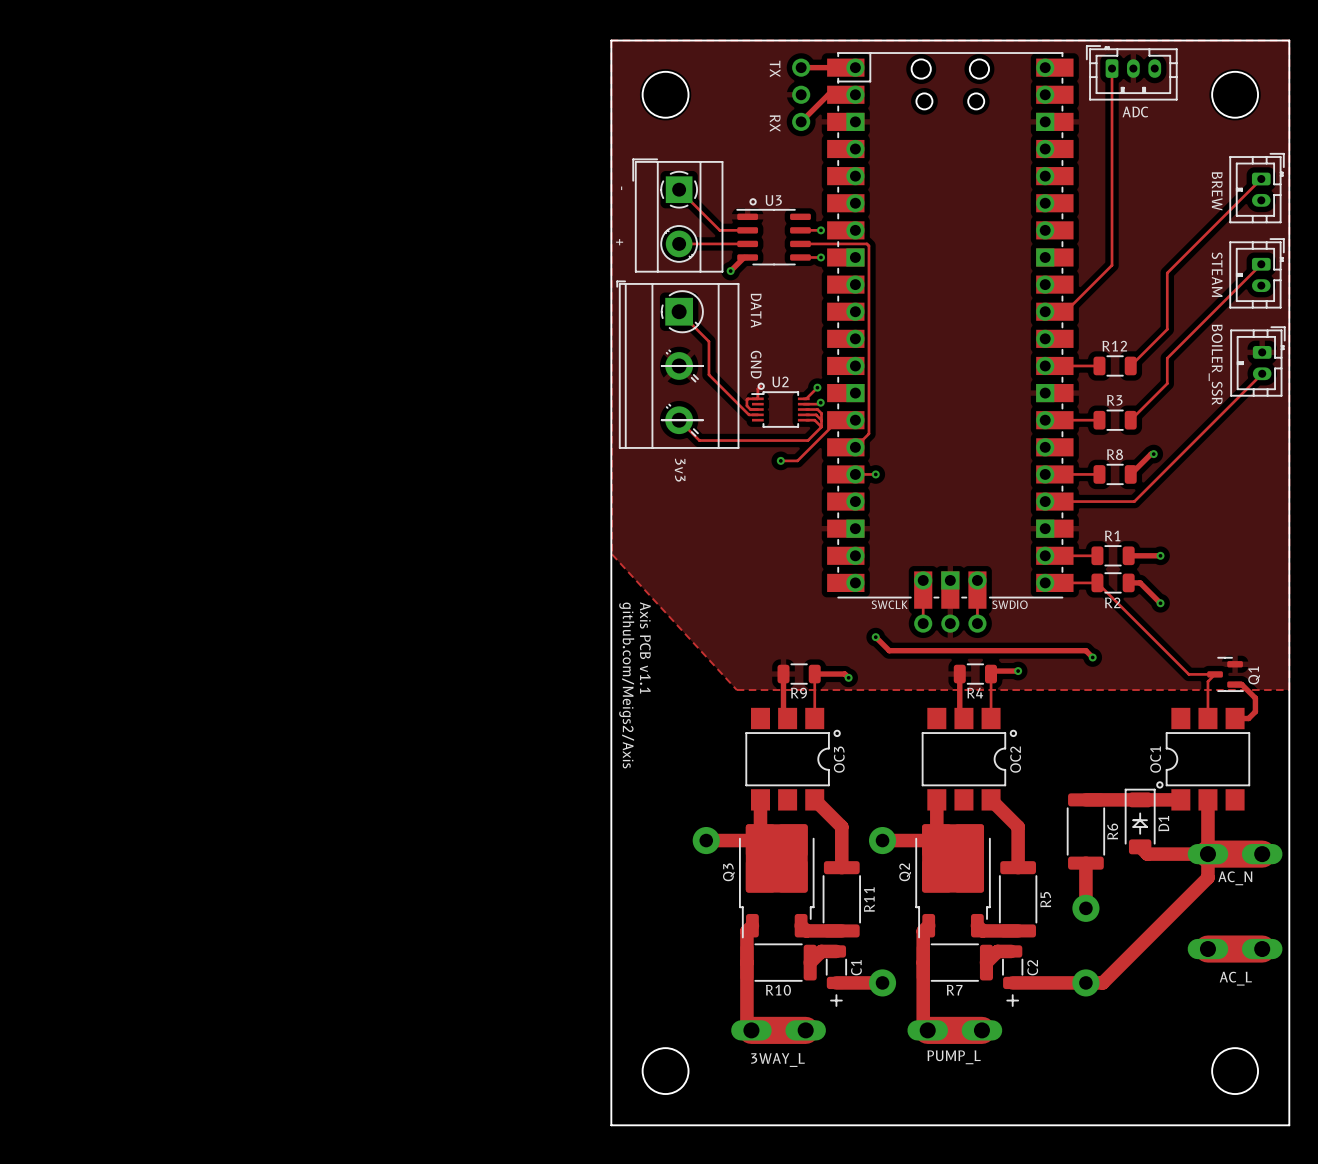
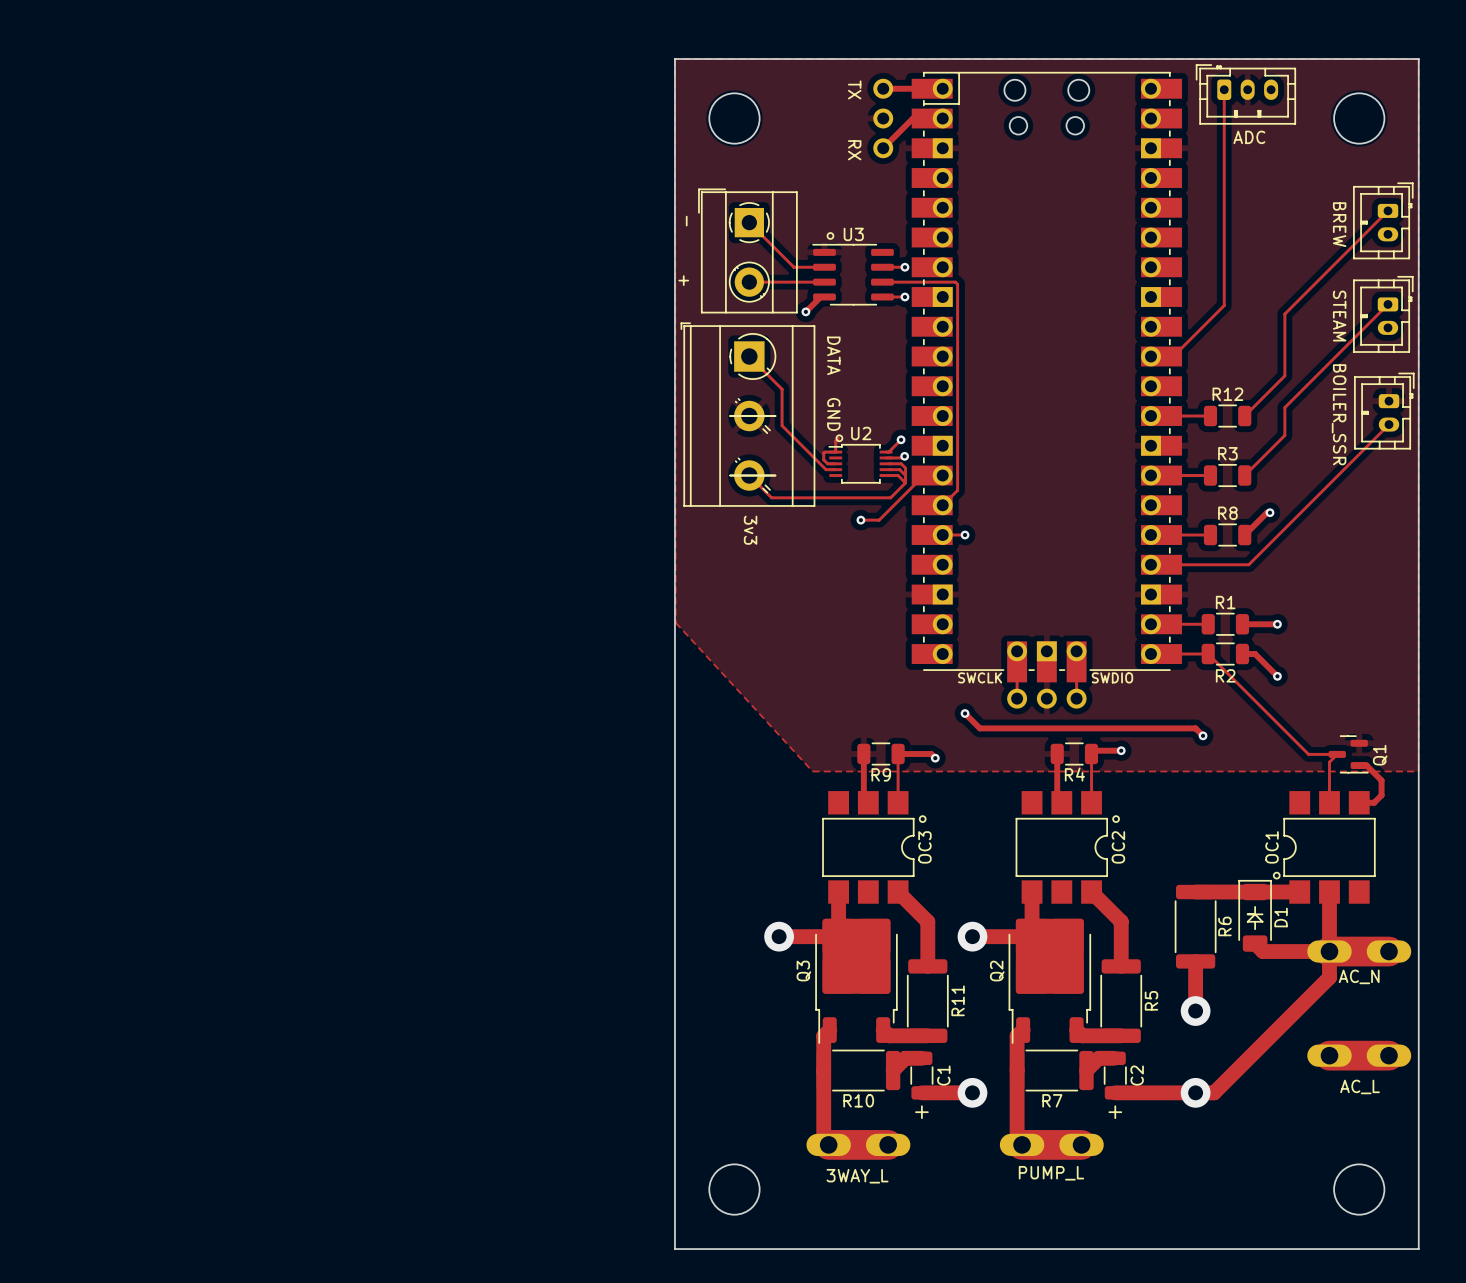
text: Axis PCB v1.1 (645, 647) -> none
text: github.com/Meigs2/Axis (626, 685) -> none

